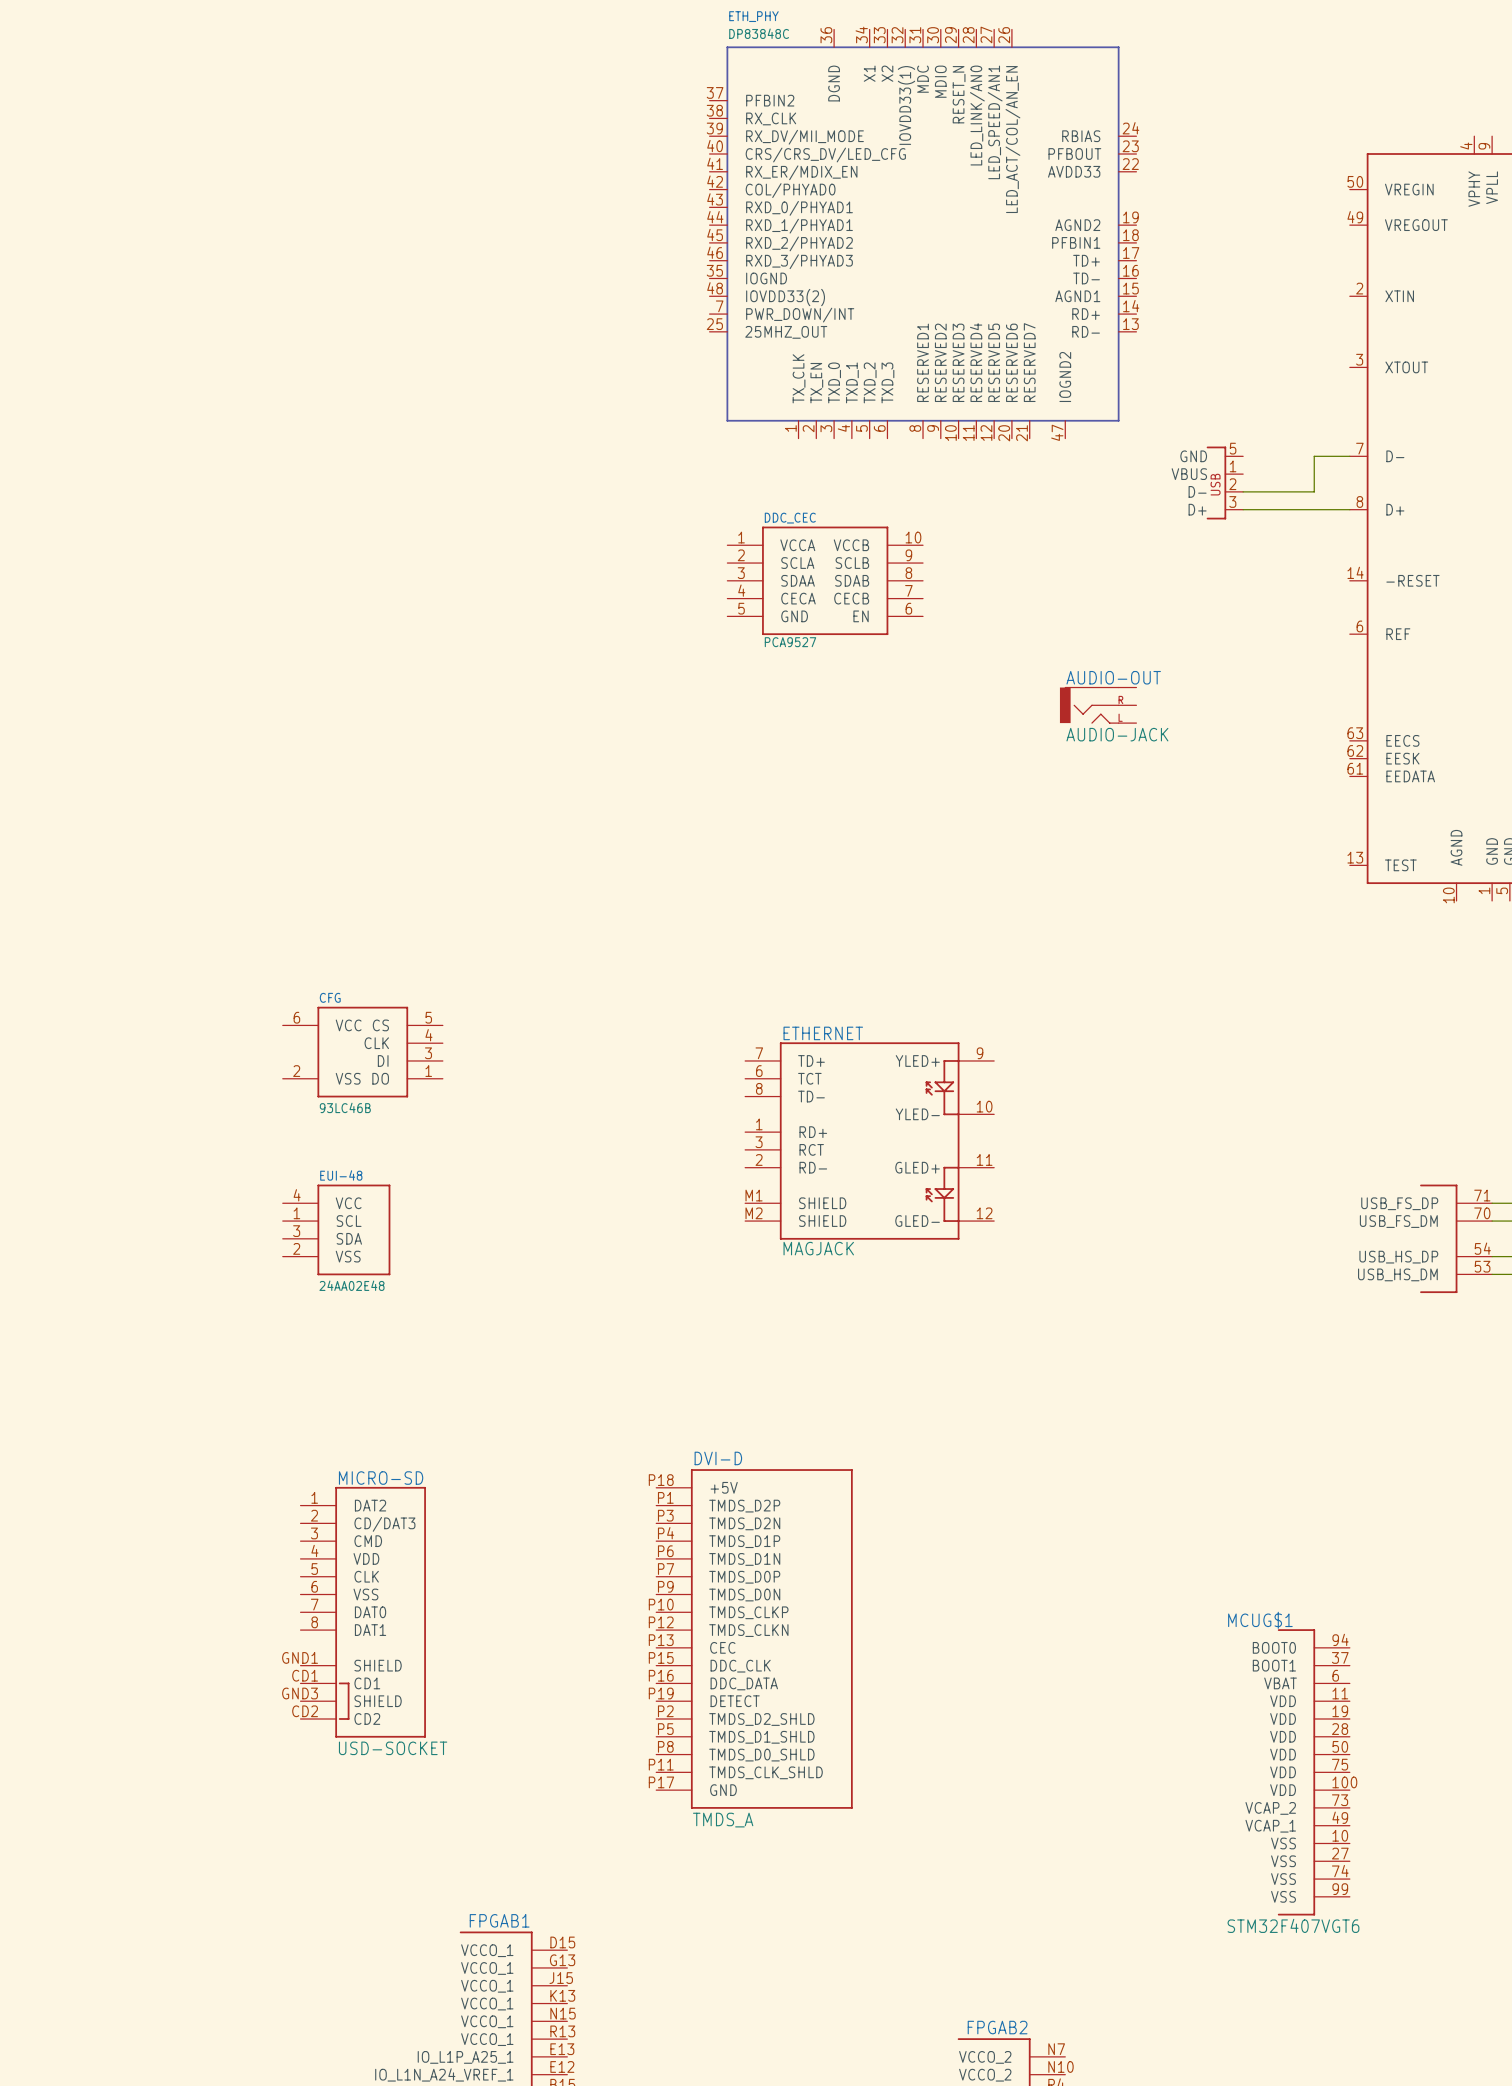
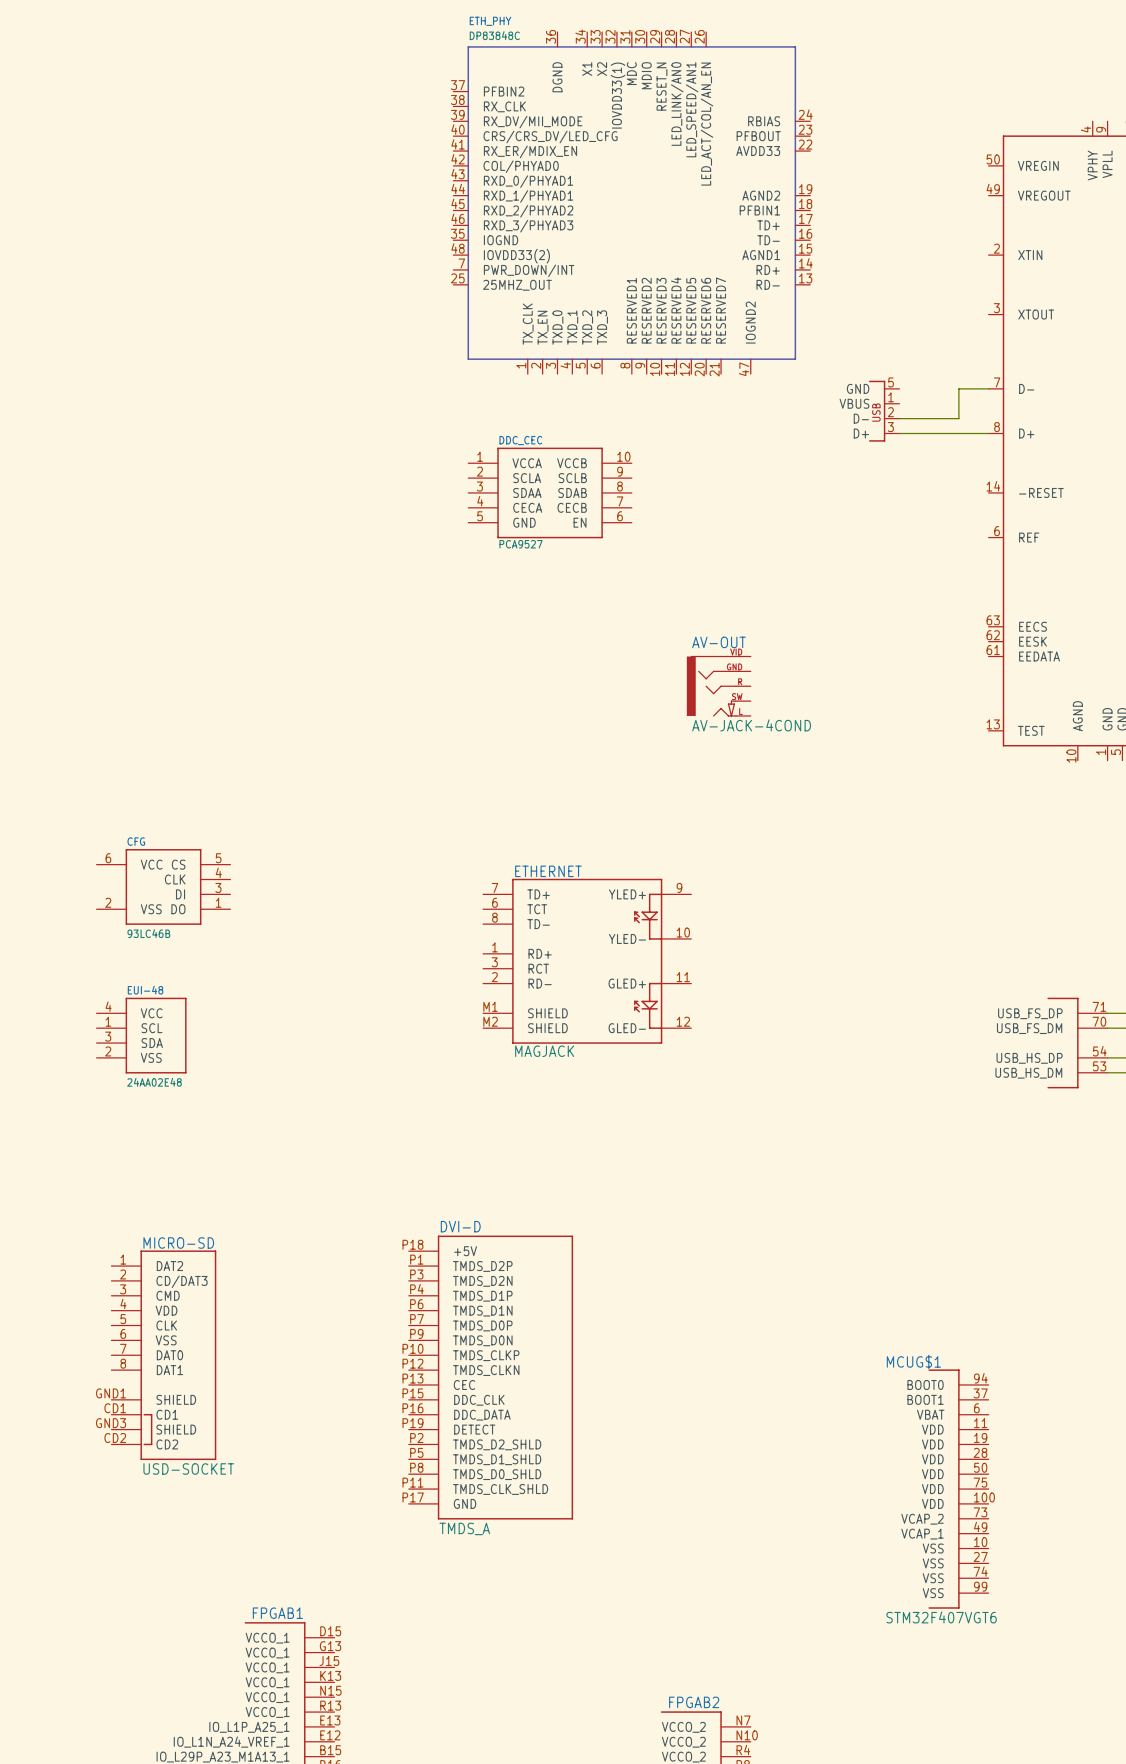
AUDIO-OUT: AUDIO-JACK (1098, 705) -> none
AV-OUT: none -> AV-JACK-4COND (718, 686)

